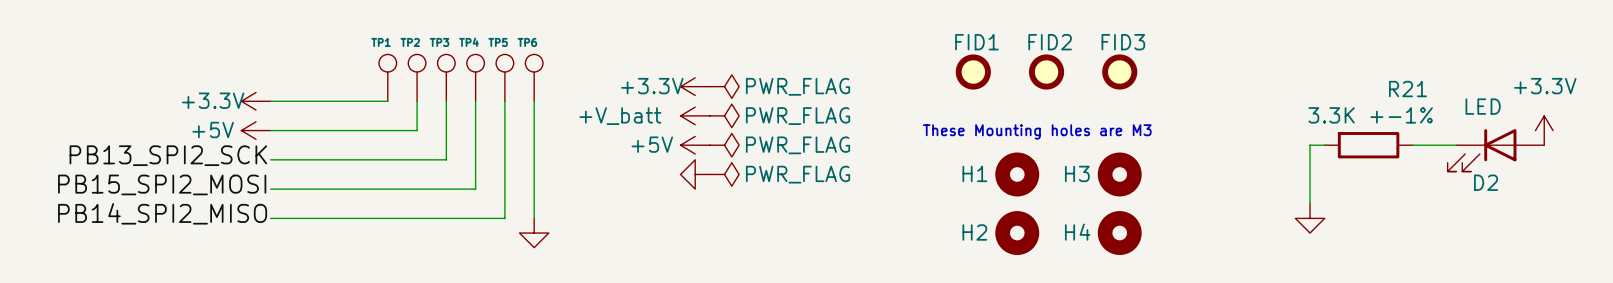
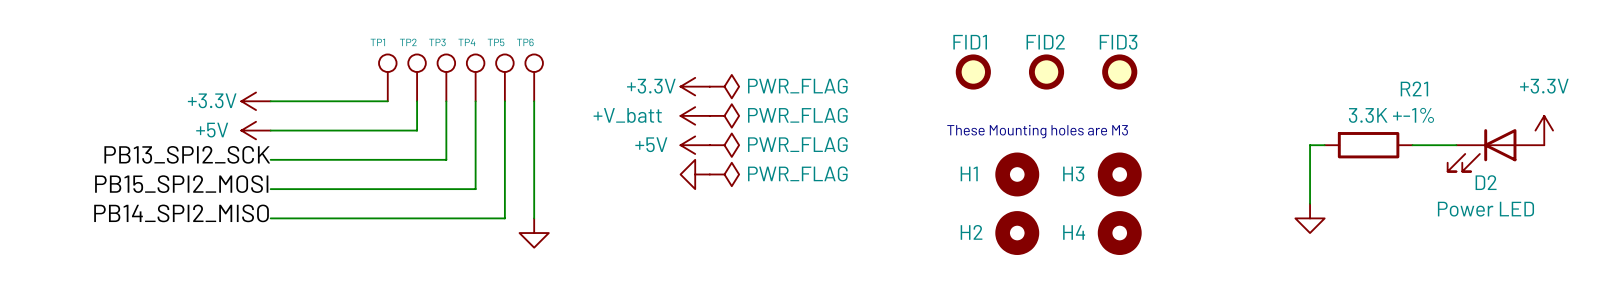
D2 value: LED (1483, 106) -> Power LED (1485, 209)

